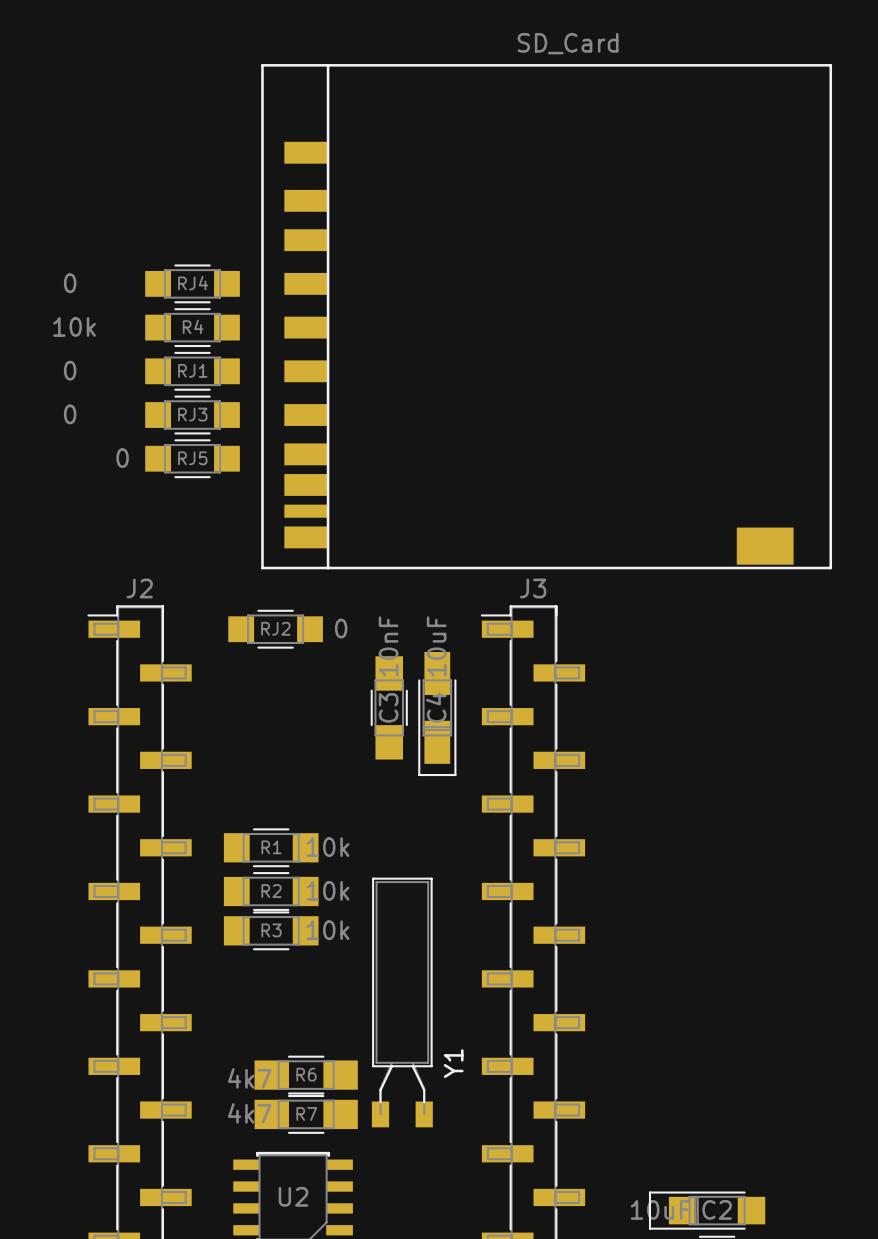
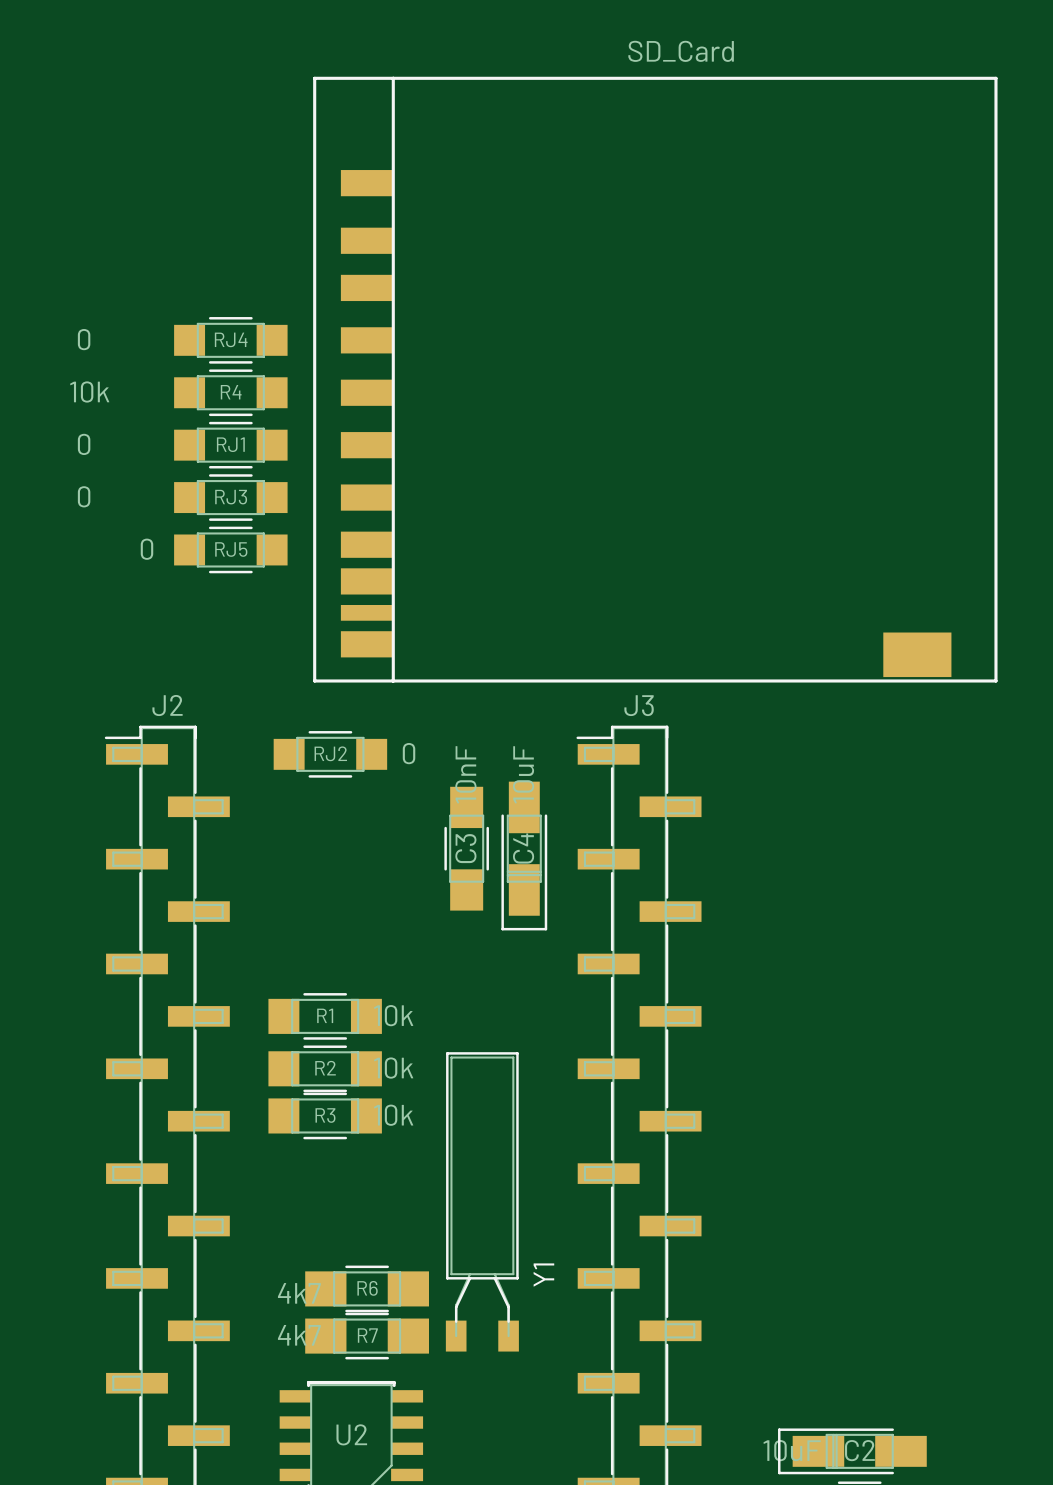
part footprint: [648, 1191, 766, 1230] -> [778, 1428, 927, 1475]

